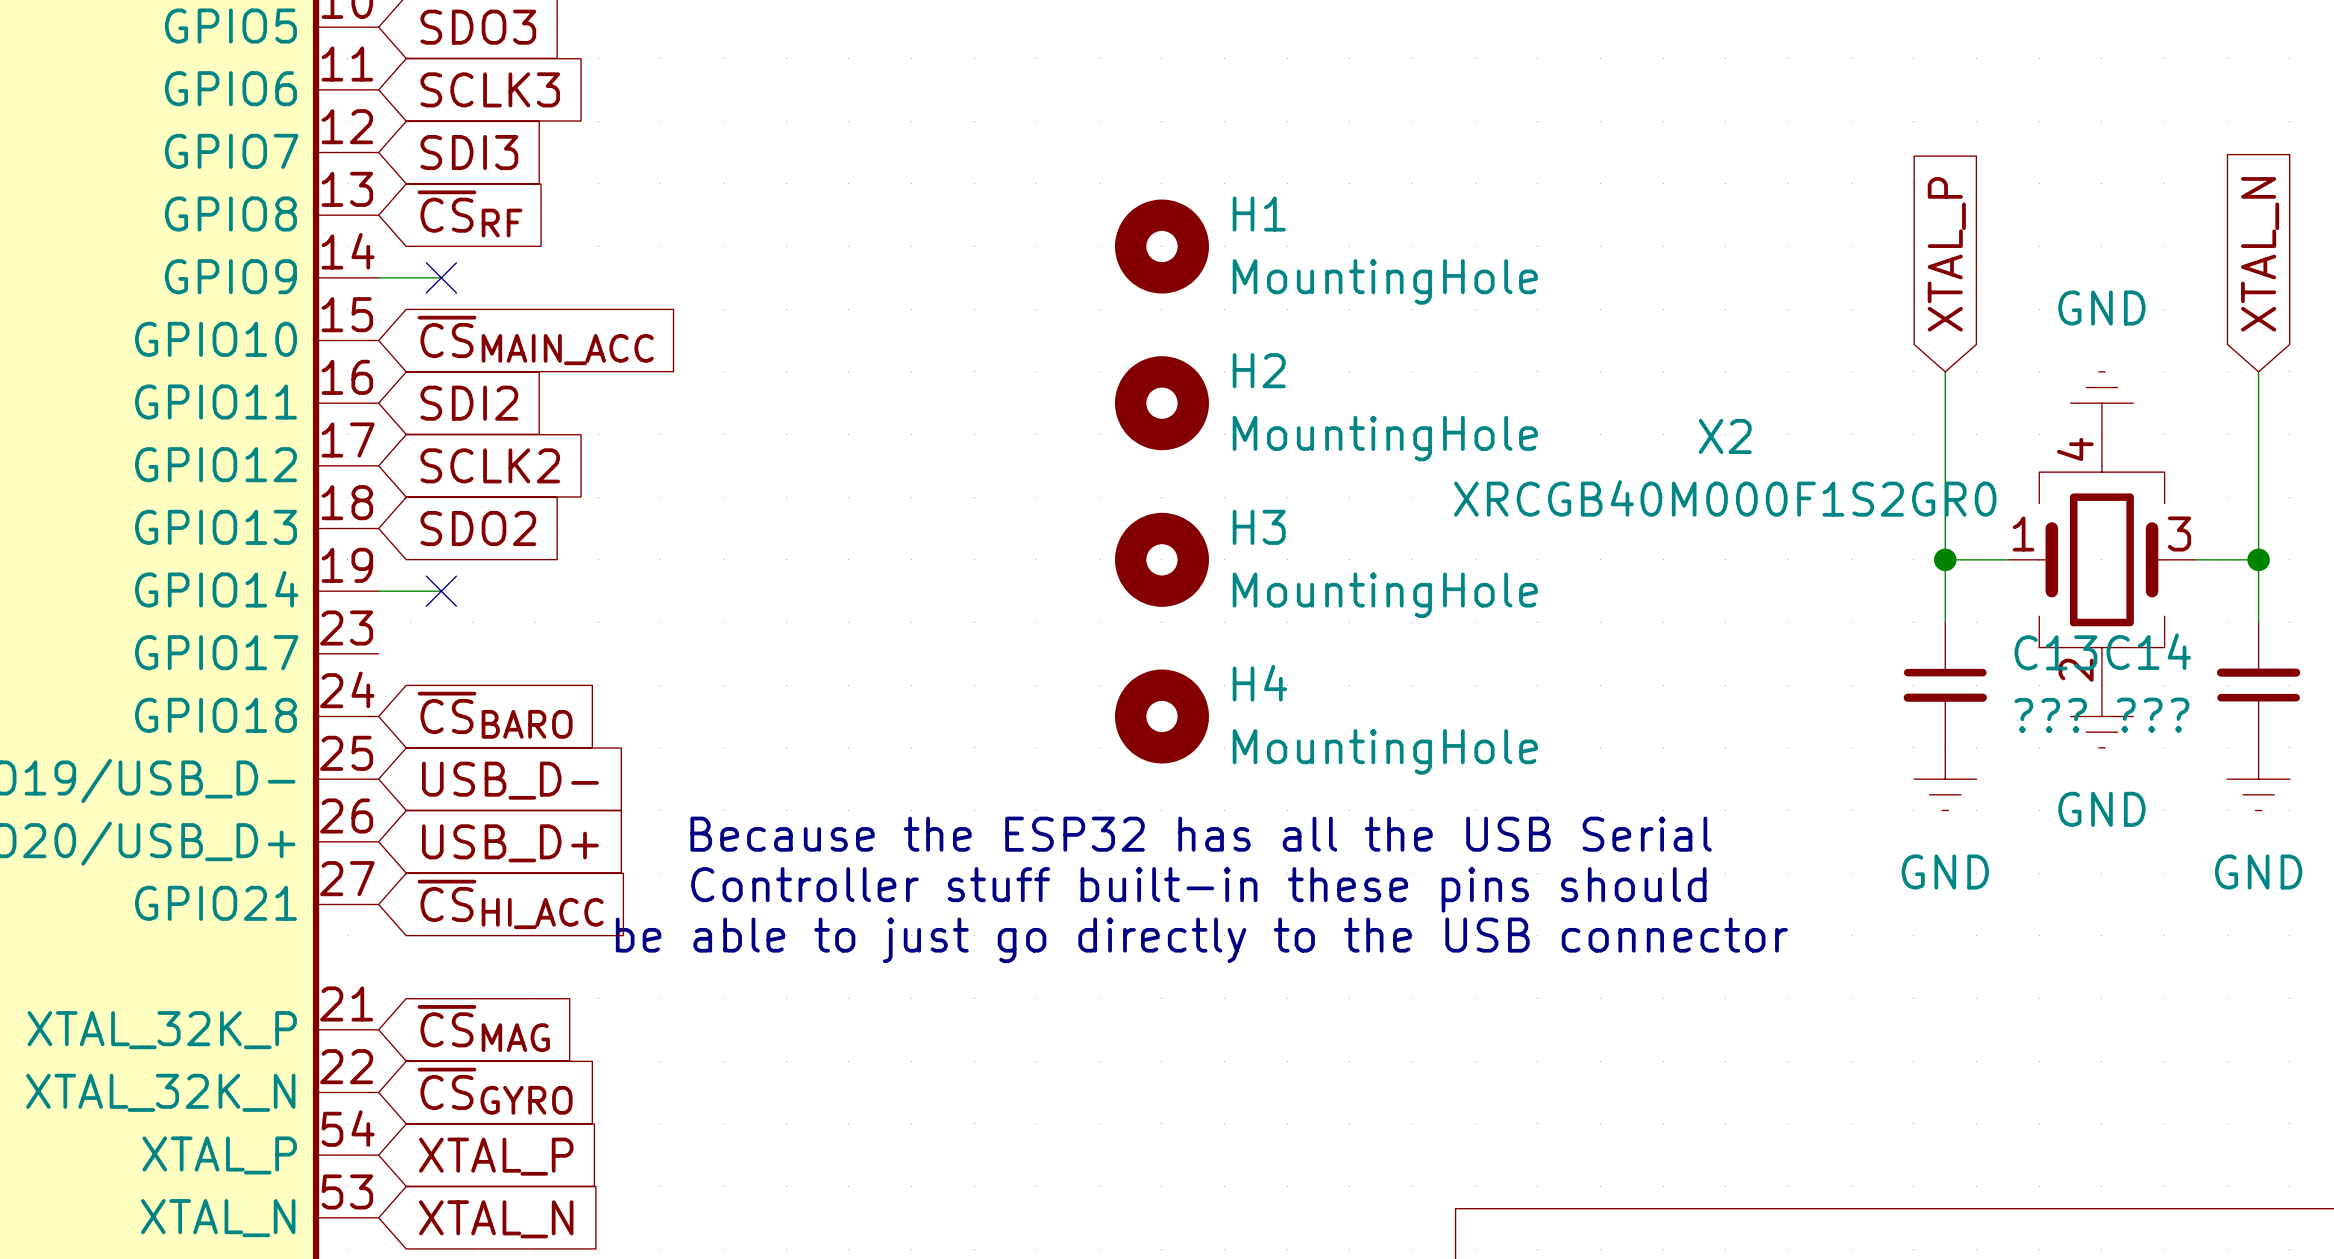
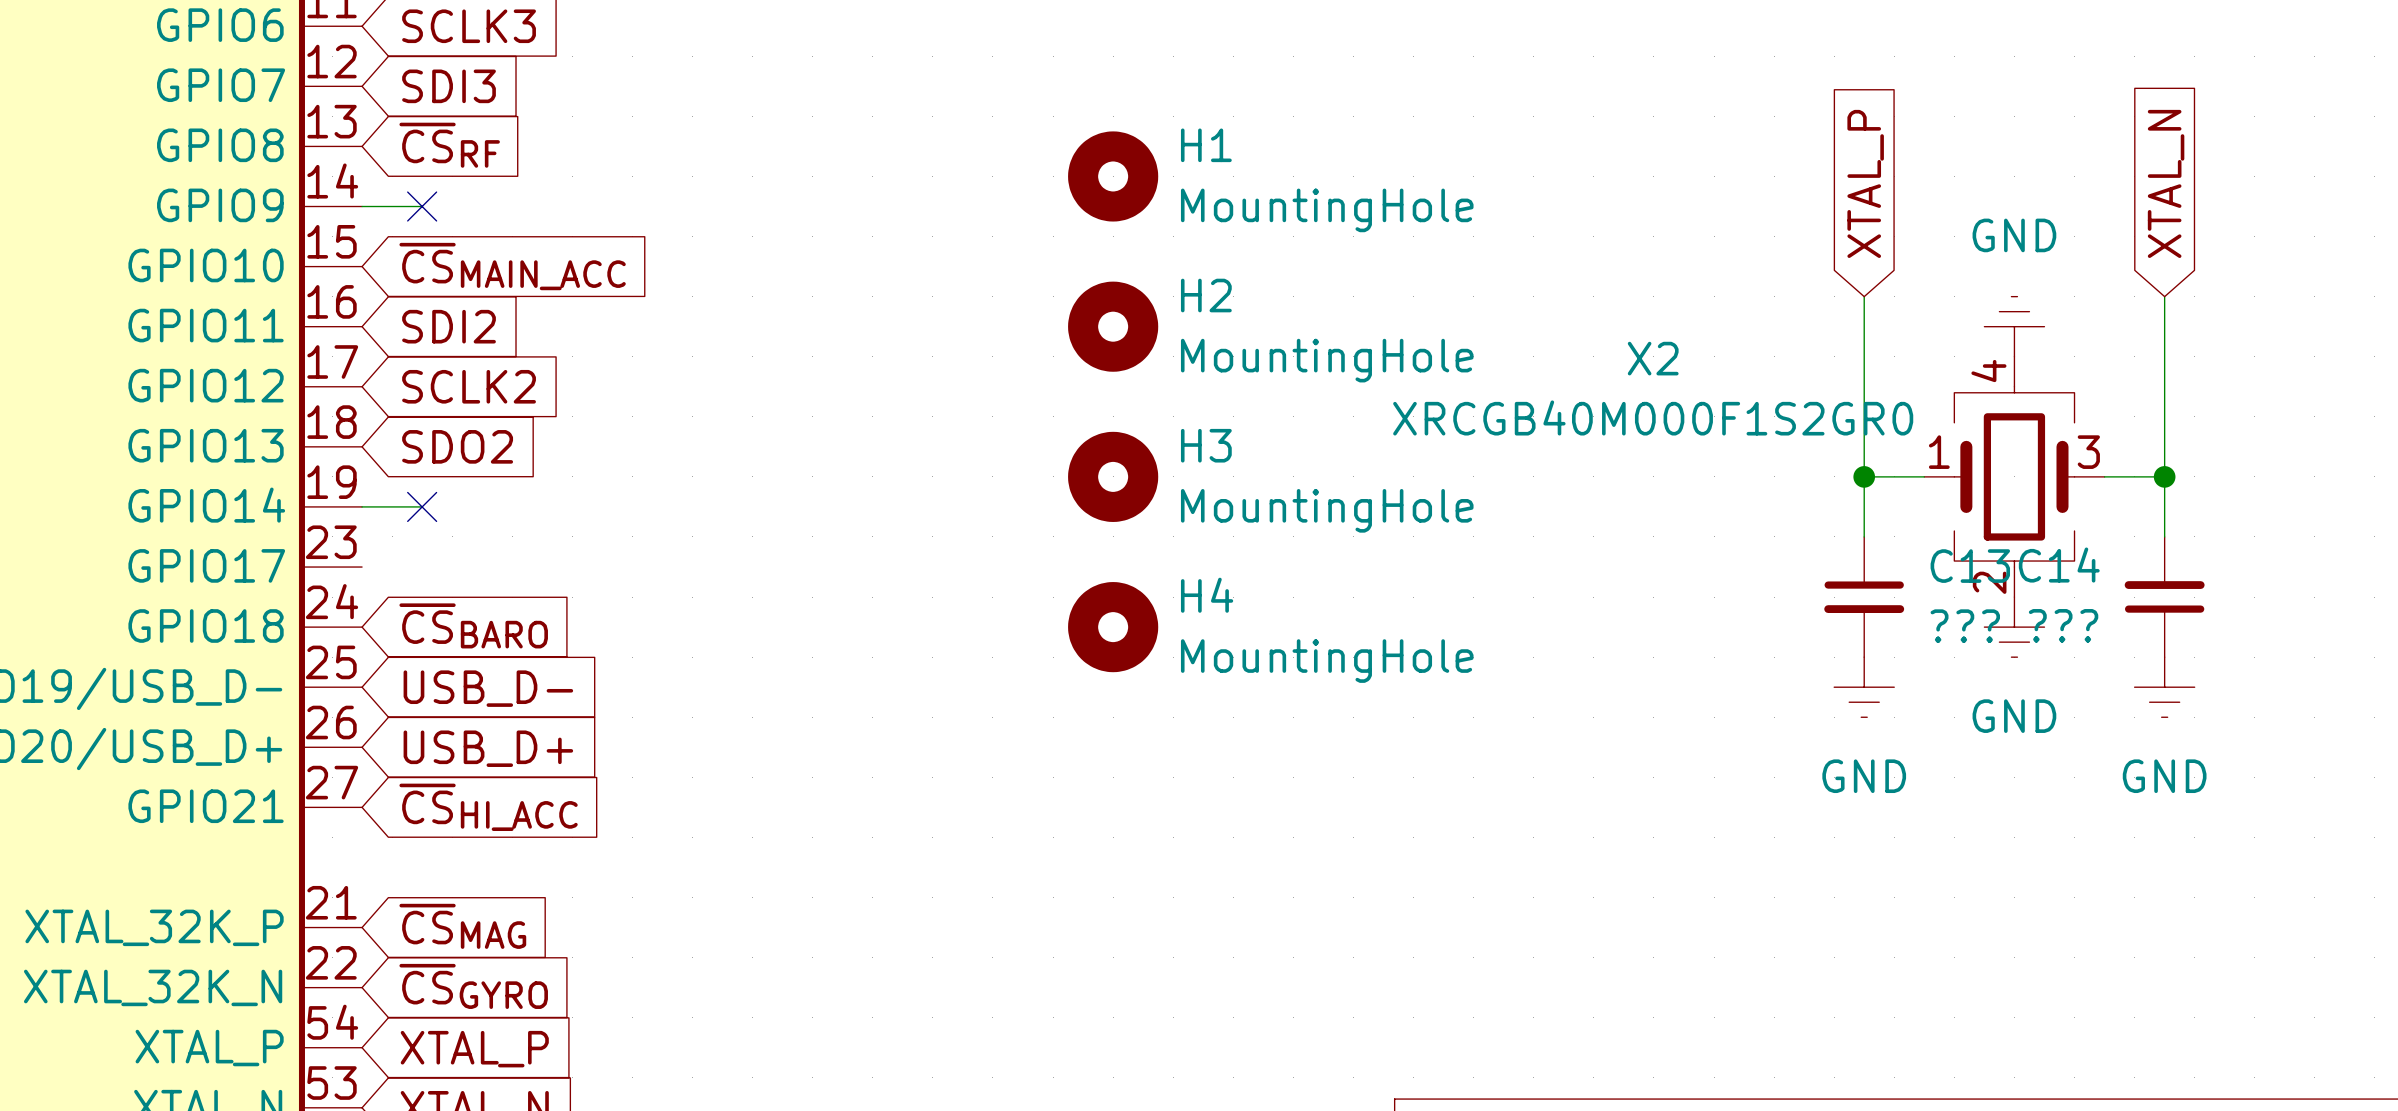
text: Because the ESP32 has all the USB Serial (1201, 834) -> none
text: Controller stuff built-in these pins should (1198, 889) -> none
text: be able to just go directly to the USB connector (1201, 940) -> none

